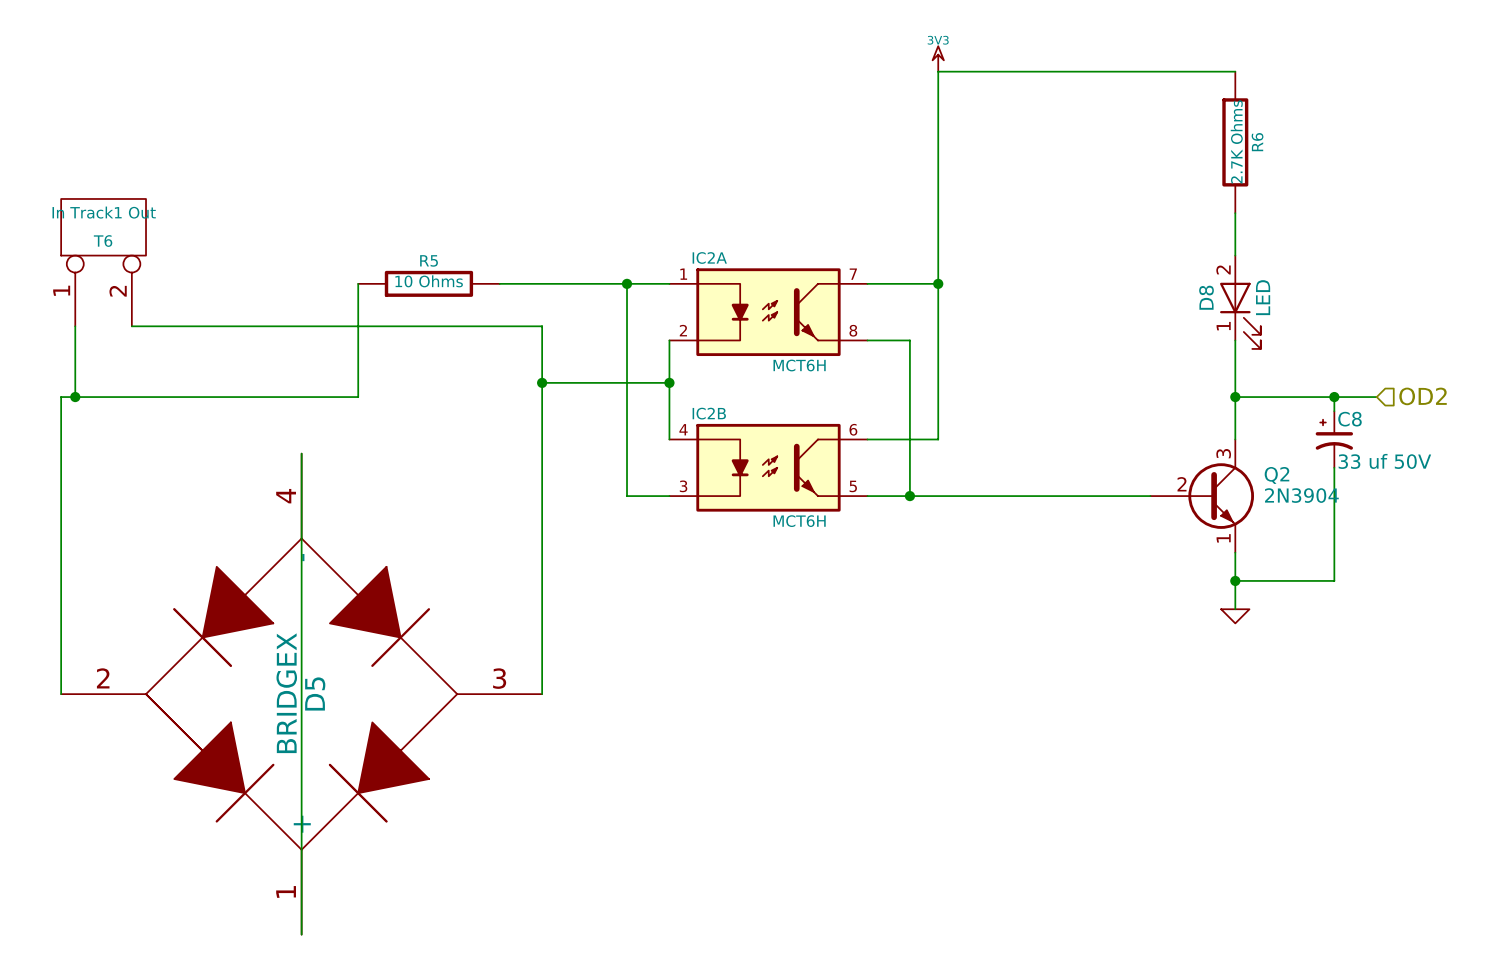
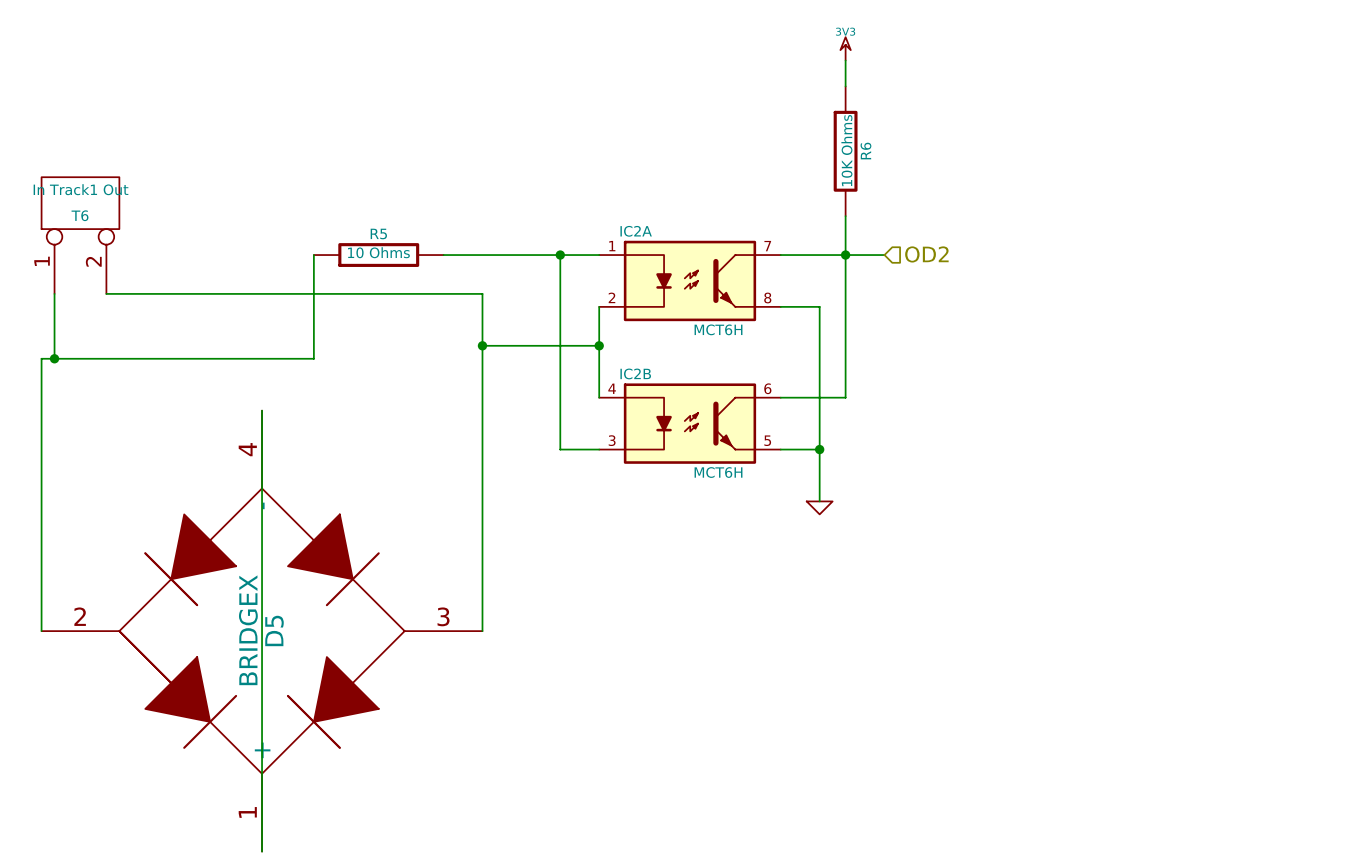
wire: (938, 71) (1235, 71) -> none
R6 value: 2.7K Ohms (1236, 141) -> 10K Ohms (846, 150)
R6 position: (1235, 142) -> (845, 151)
wire: (1235, 213) (1235, 255) -> none
wire: none -> (845, 255) (884, 255)
hierarchical label: none -> OD2 (926, 254)
D8: LED (1240, 302) -> none
wire: (1235, 340) (1235, 439) -> none
hierarchical label: OD2 (1423, 396) -> none
wire: (1235, 397) (1376, 397) -> none
junction: (1235, 397) -> none
wire: (1334, 397) (1334, 411) -> none
junction: (1334, 397) -> none
C8: 33 uf 50V (1334, 439) -> none
wire: (1334, 467) (1334, 580) (1235, 580) -> none
wire: (909, 496) (1150, 496) -> (819, 449) (819, 501)
Q2: 2N3904 (1202, 496) -> none
wire: (1235, 552) (1235, 609) -> none
power symbol: none -> (819, 507)
junction: (1235, 580) -> none
power symbol: (1235, 616) -> none

